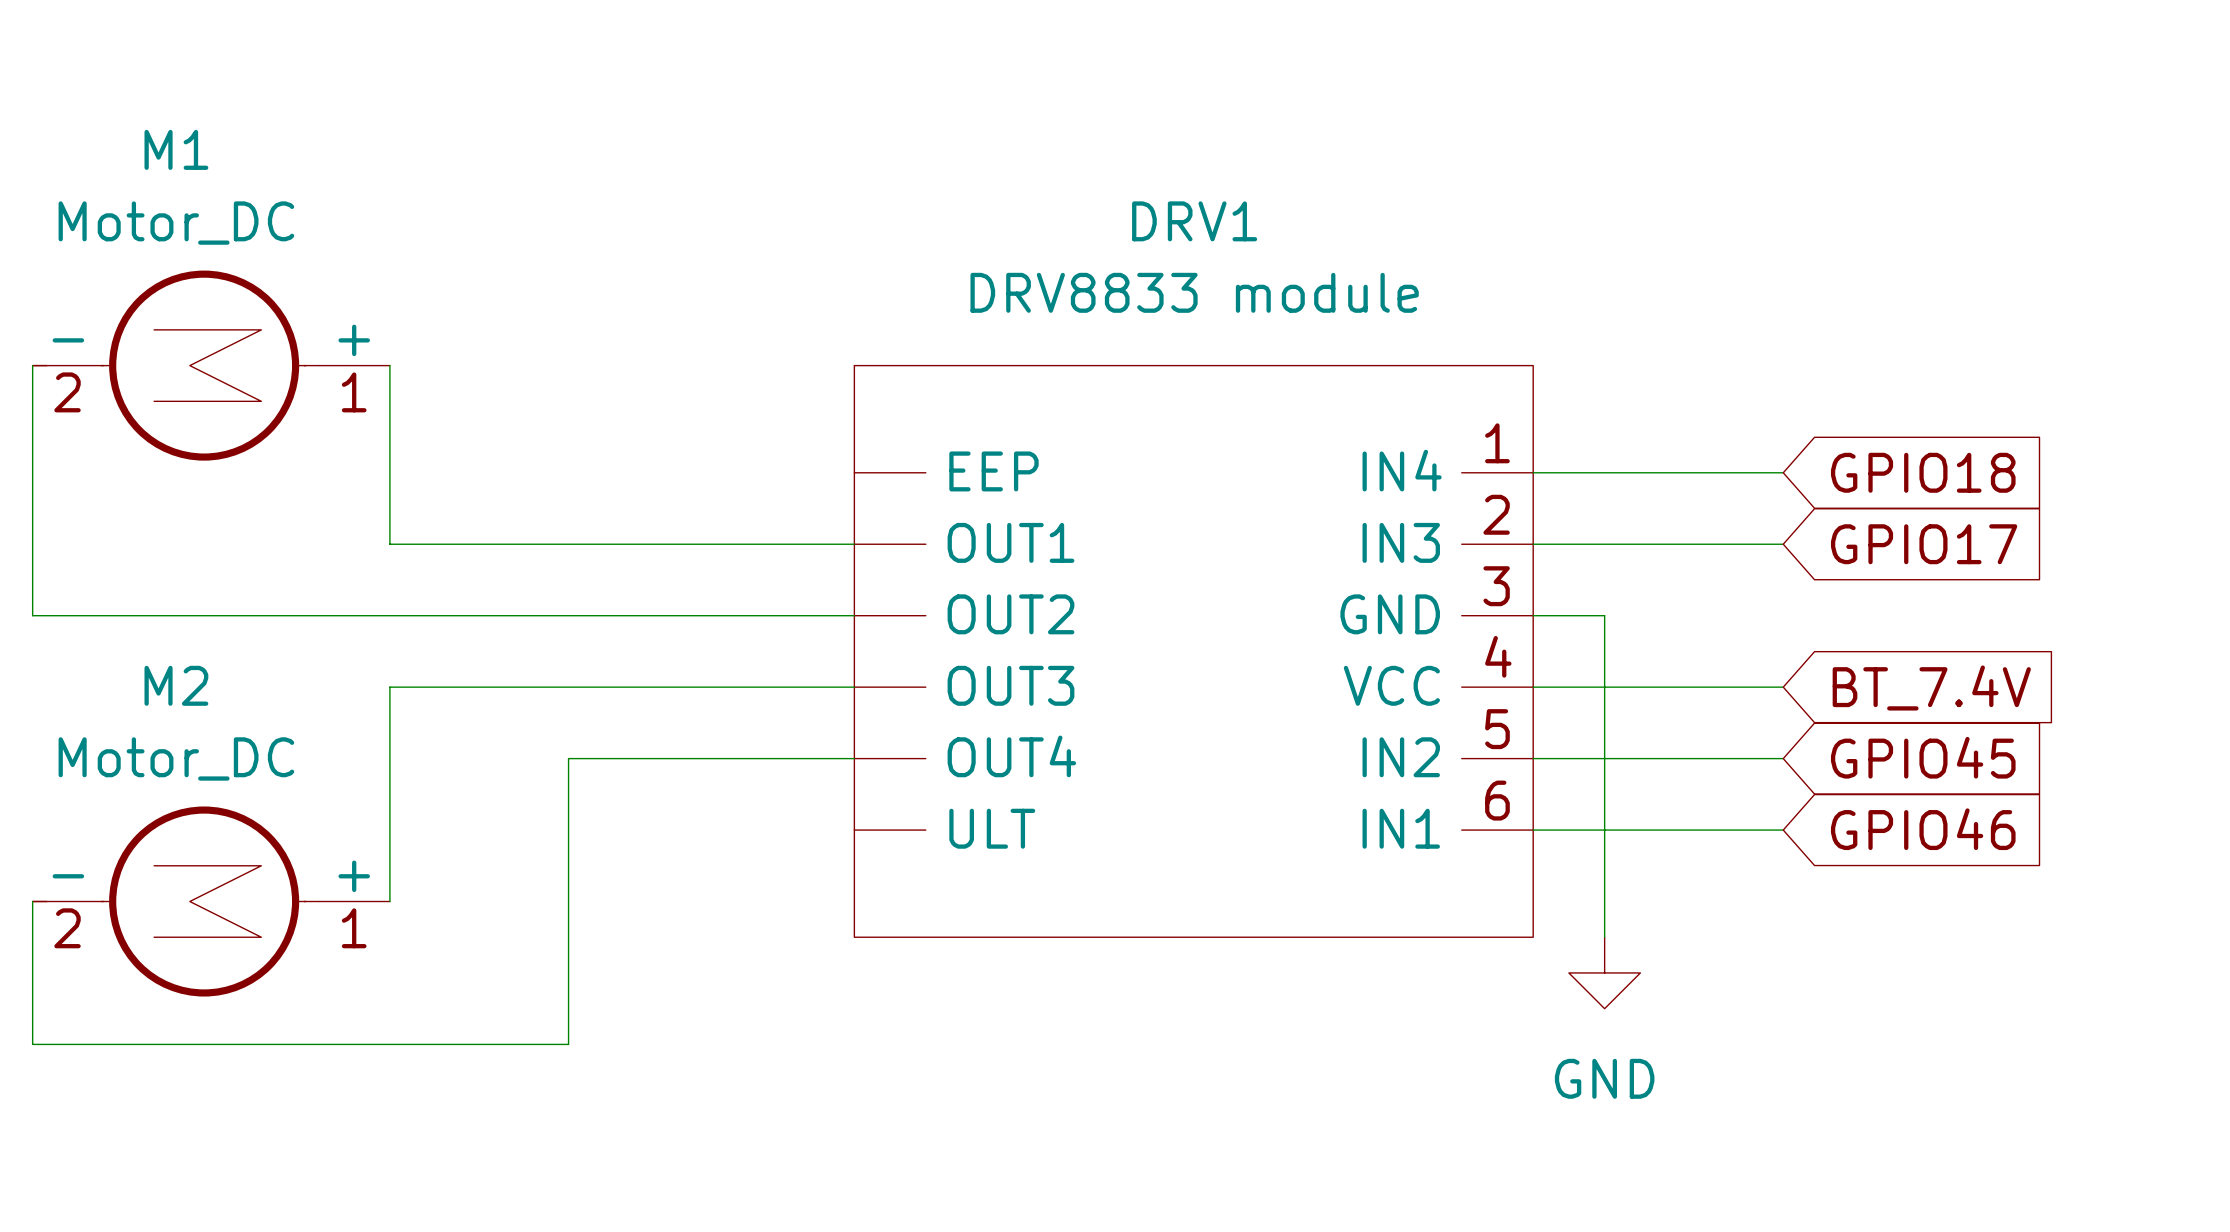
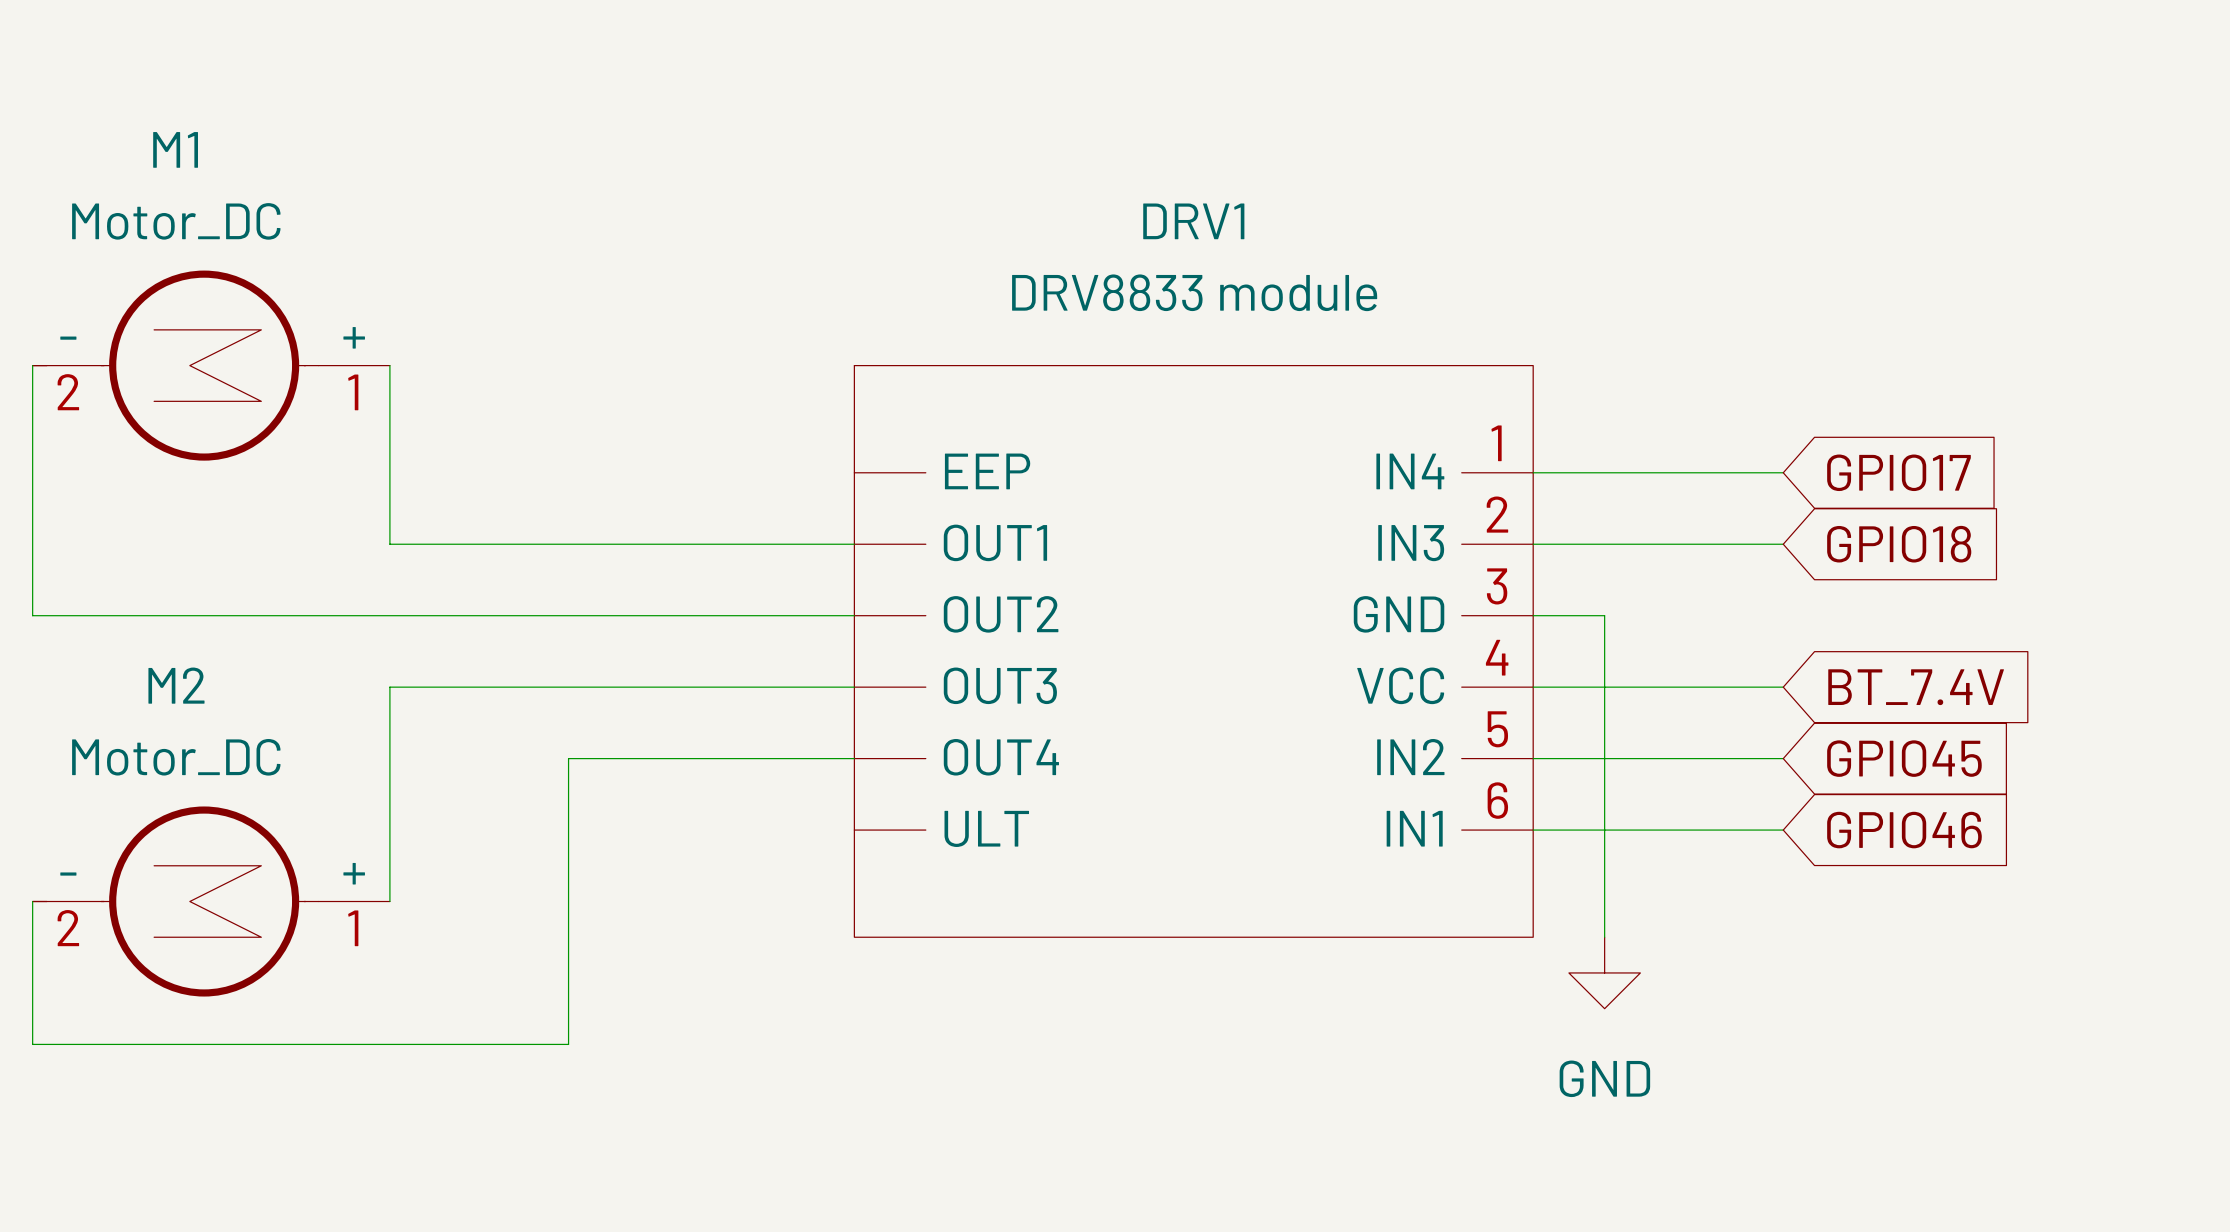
global label: GPIO18 (1923, 472) -> GPIO17 (1898, 472)
global label: GPIO17 (1924, 544) -> GPIO18 (1899, 544)

